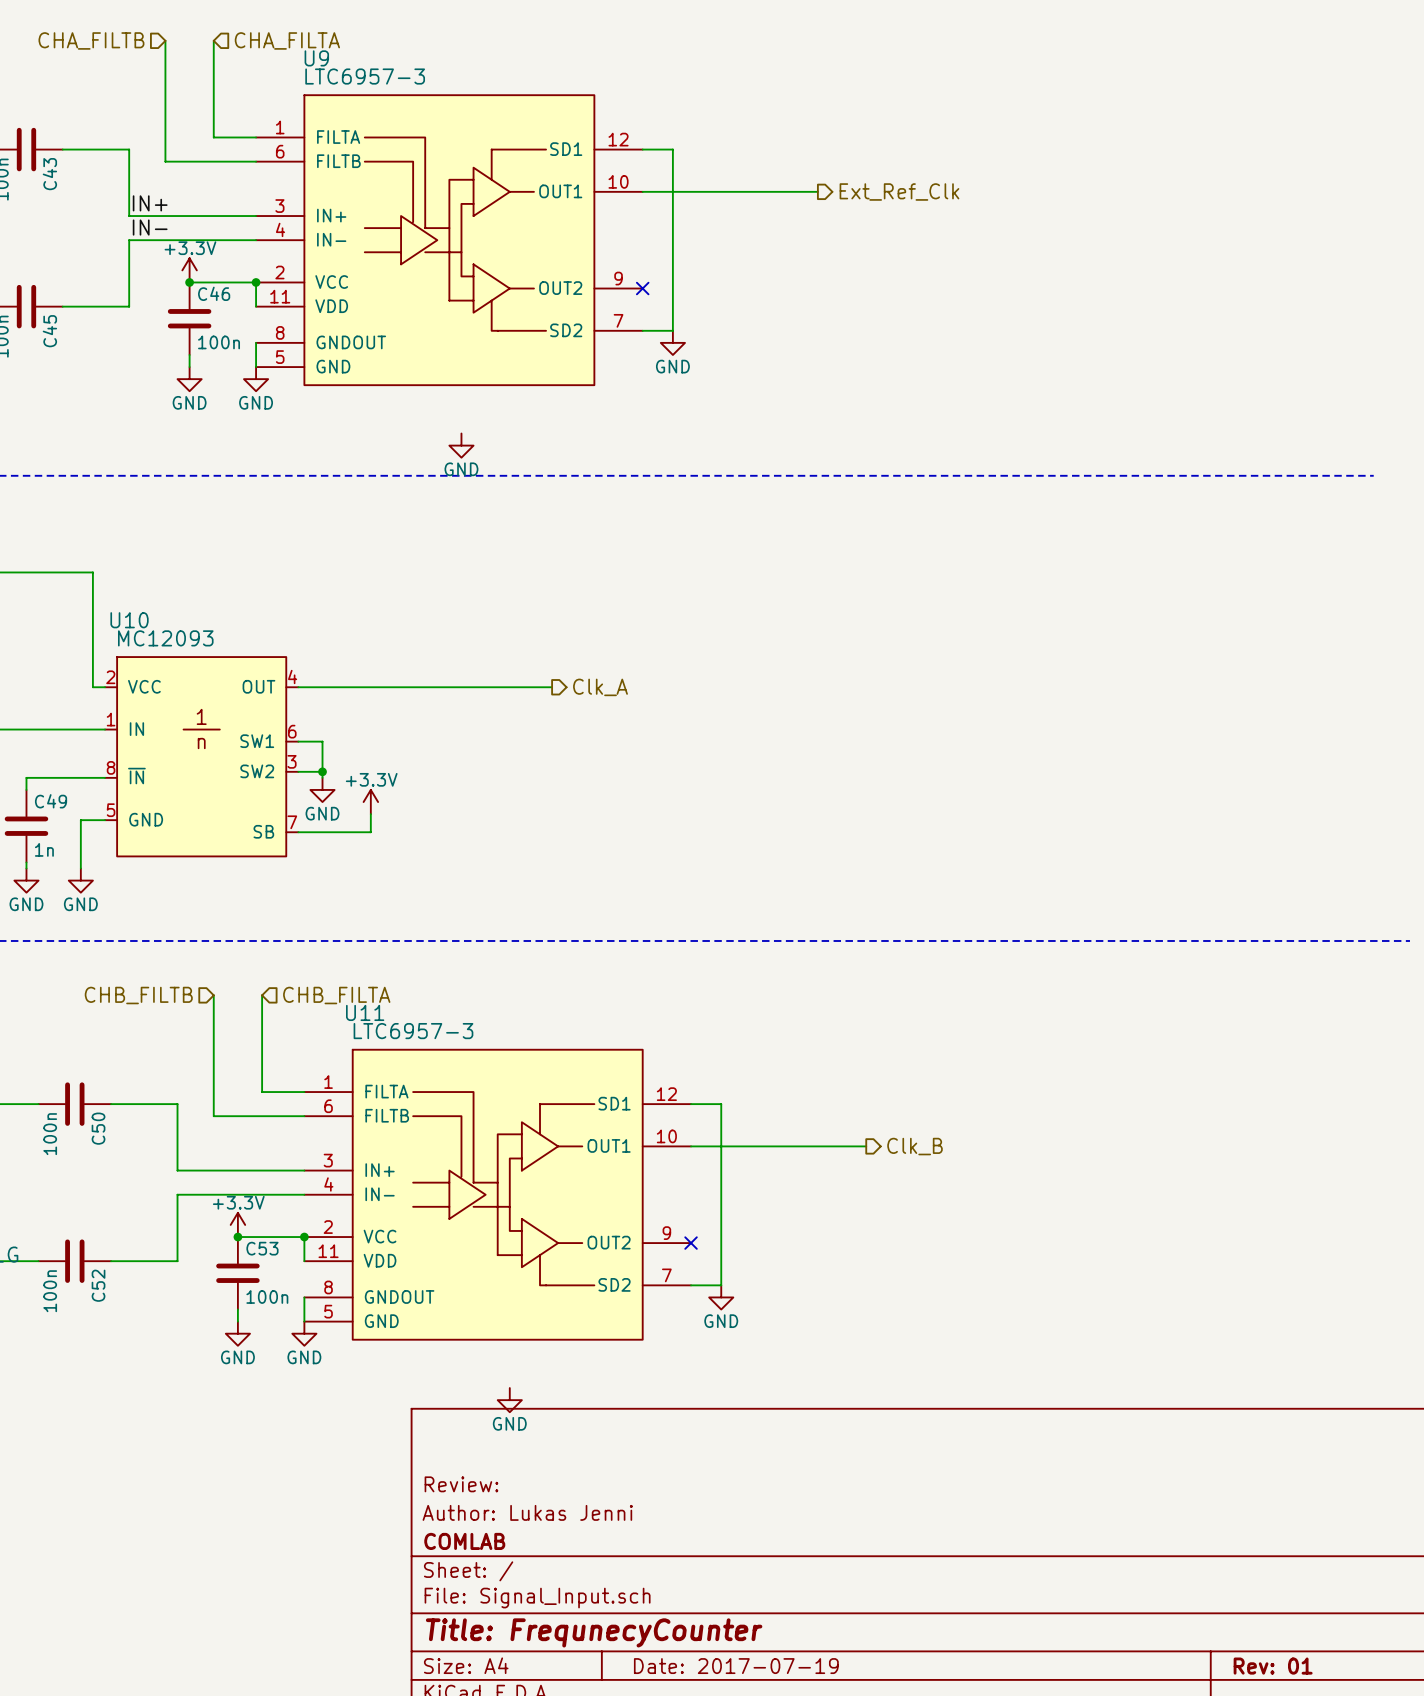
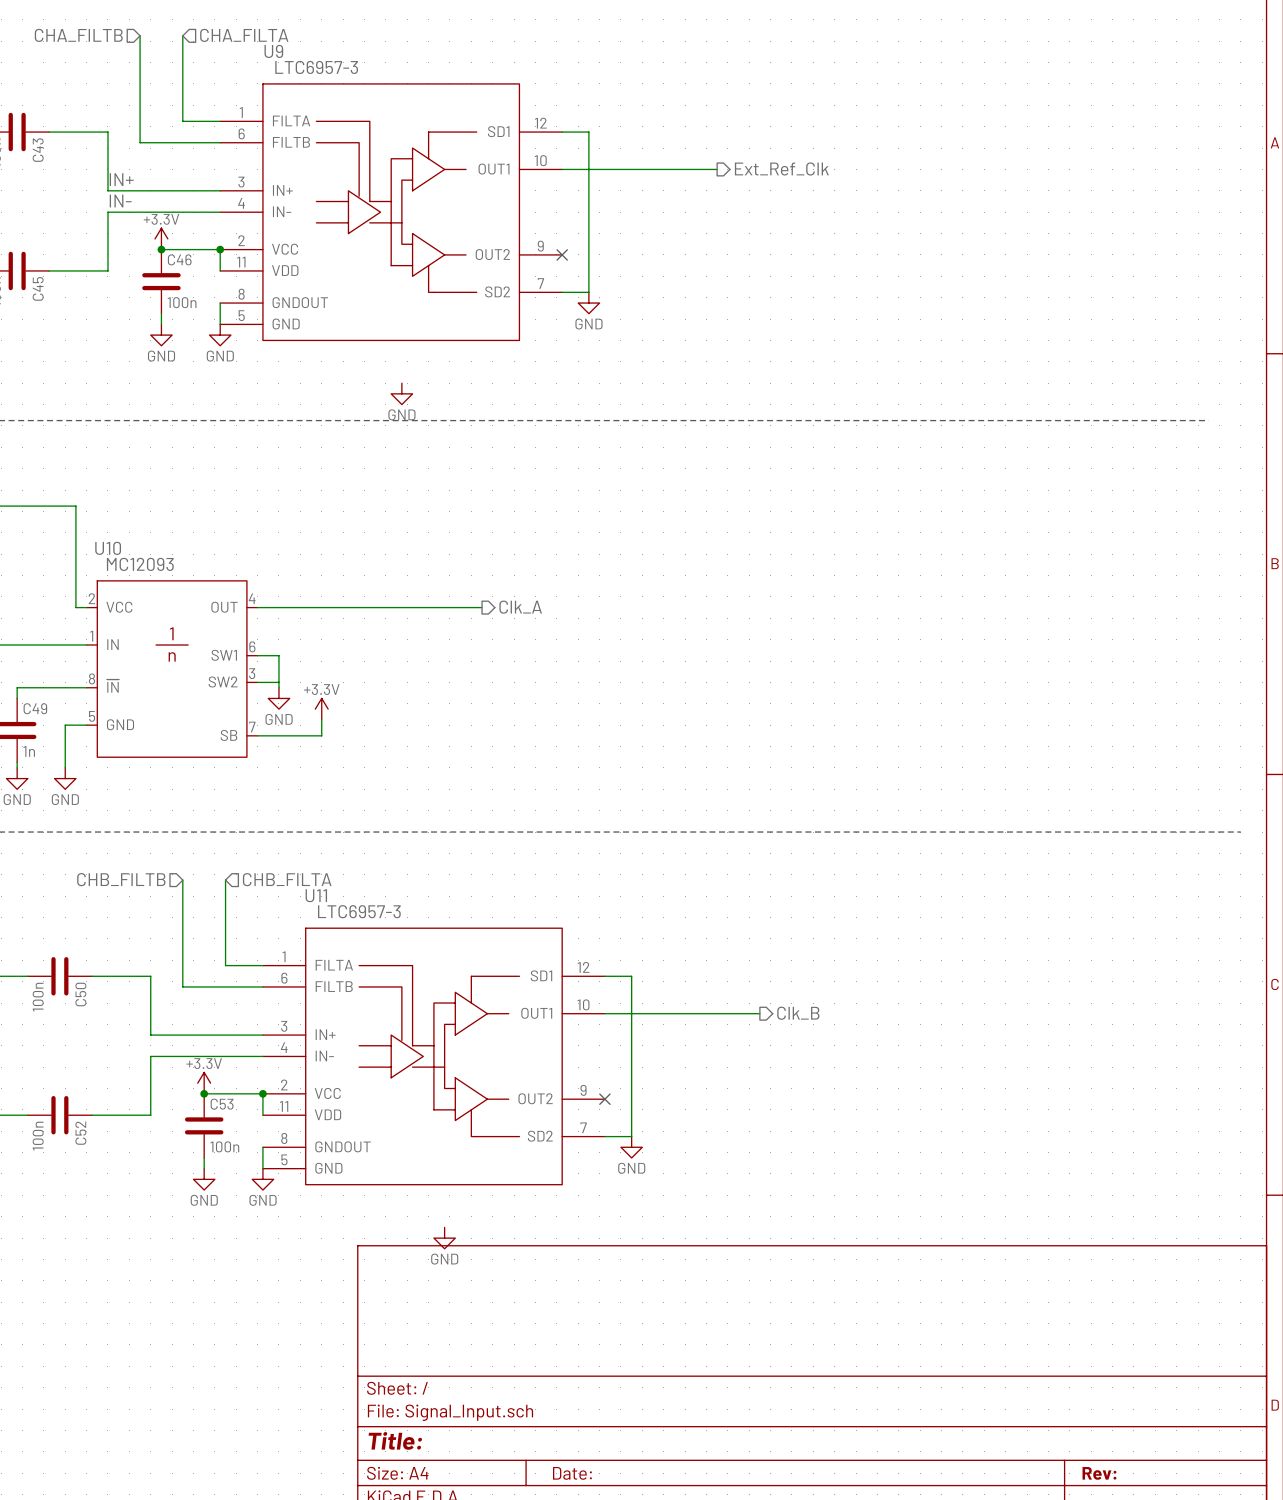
junction: (322, 771) -> none
title block: Review: (461, 1484) -> none
title block: Author: Lukas Jenni (527, 1512) -> none
title block: COMLAB (464, 1541) -> none
title block: Title: FrequnecyCounter (594, 1632) -> Title: (395, 1440)
title block: Date: 2017-07-19 (736, 1666) -> Date: (572, 1473)
title block: Rev: 01 (1273, 1666) -> Rev: (1099, 1473)

